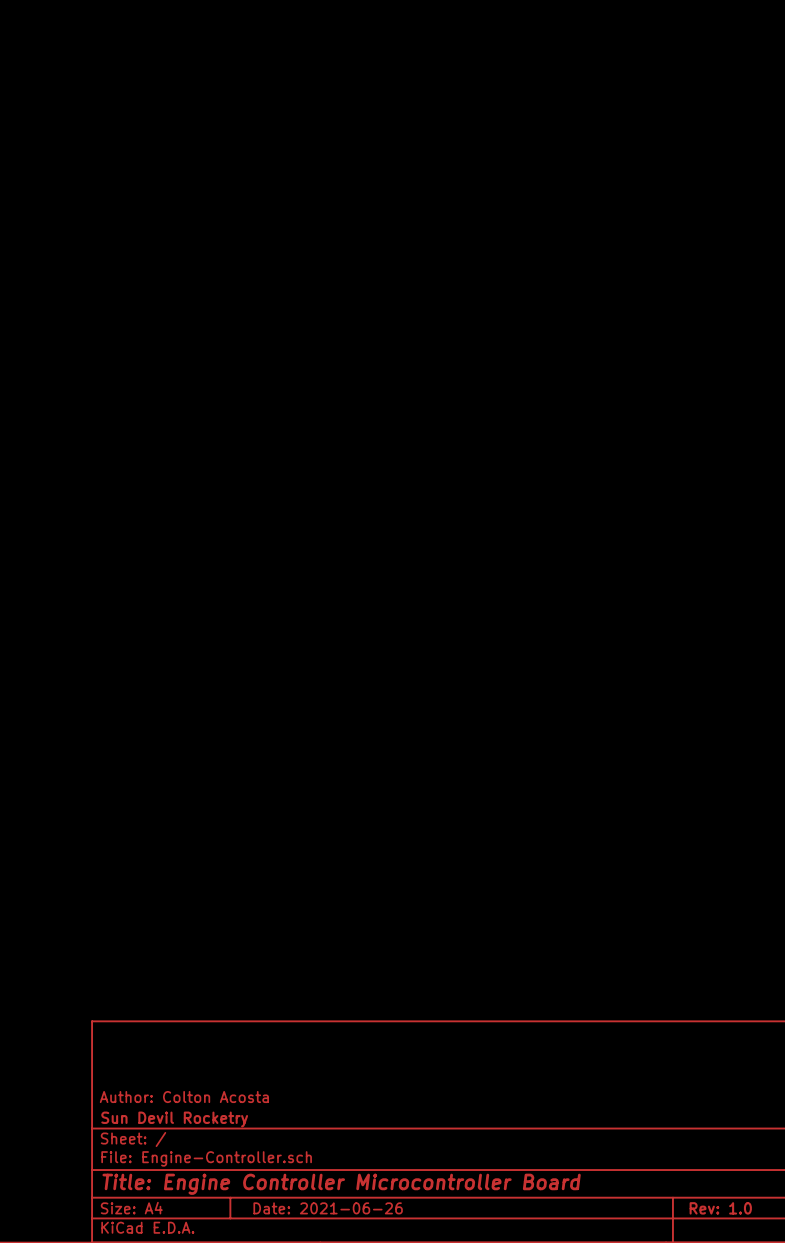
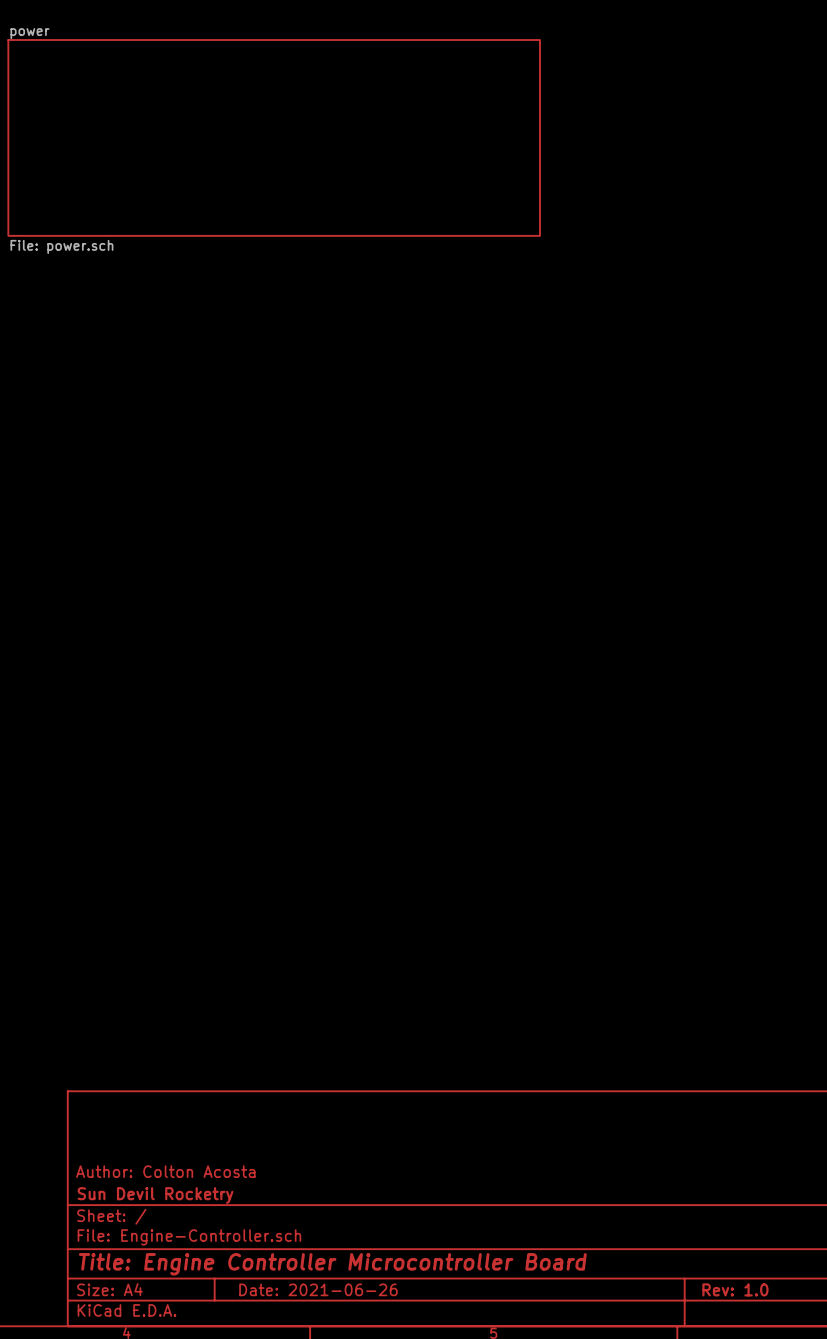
sheet power: none -> File: power.sch (274, 137)

